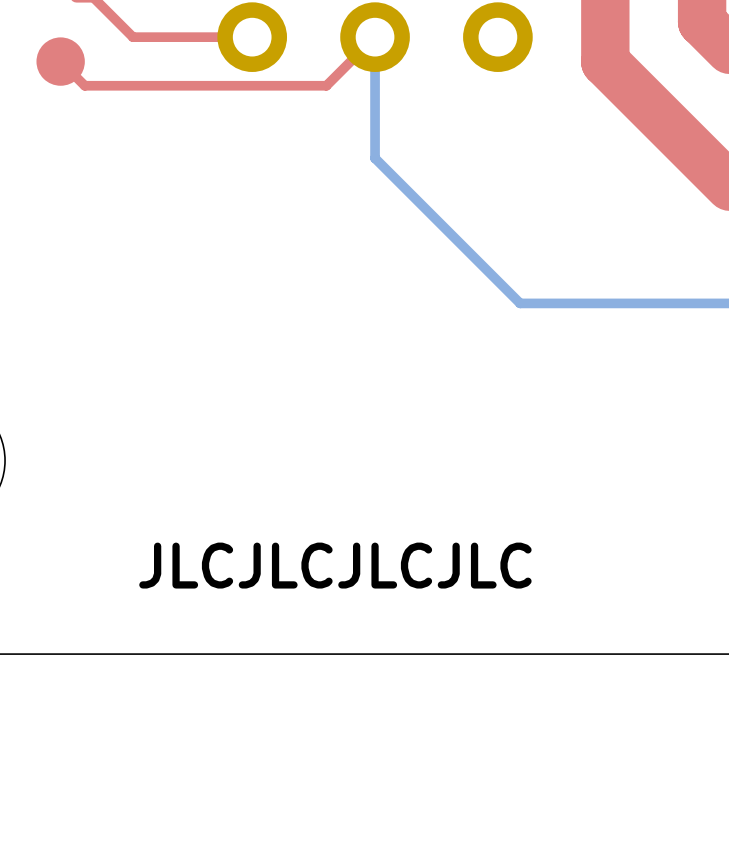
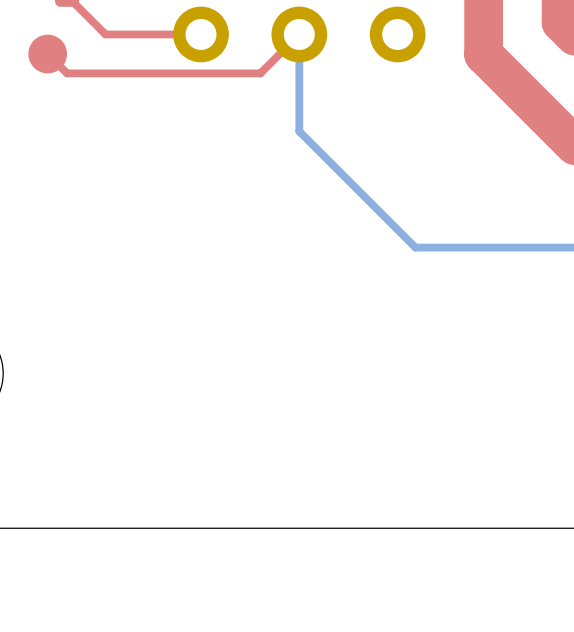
drawing: [139, 542, 532, 589] -> none

